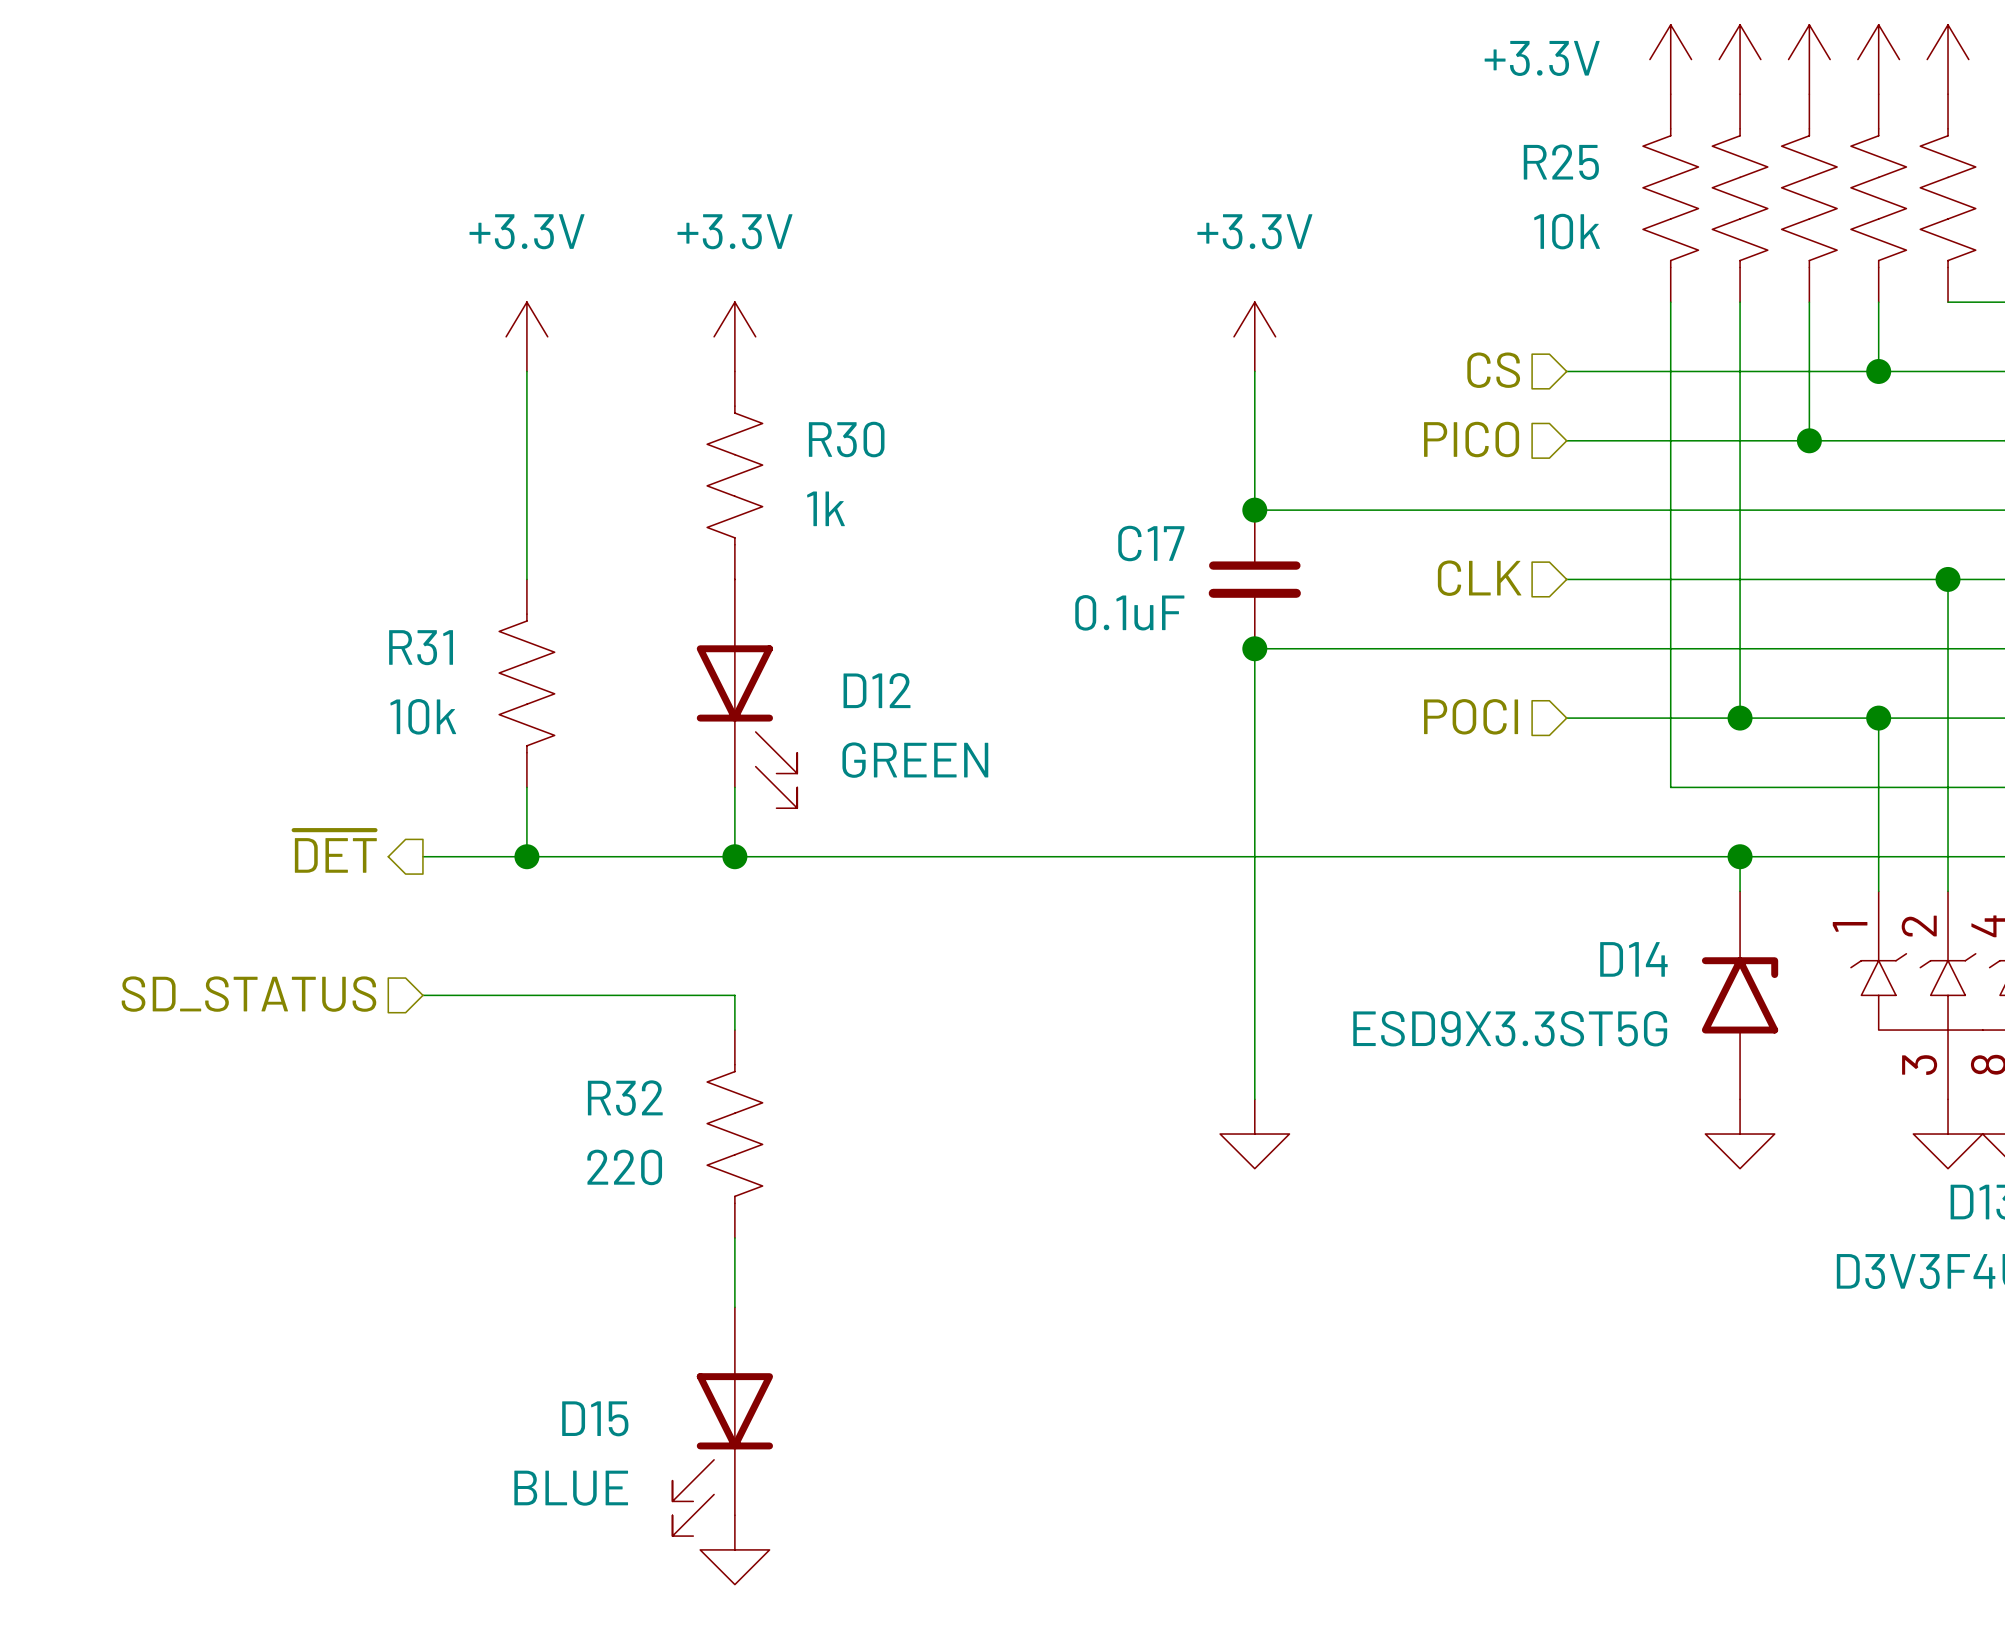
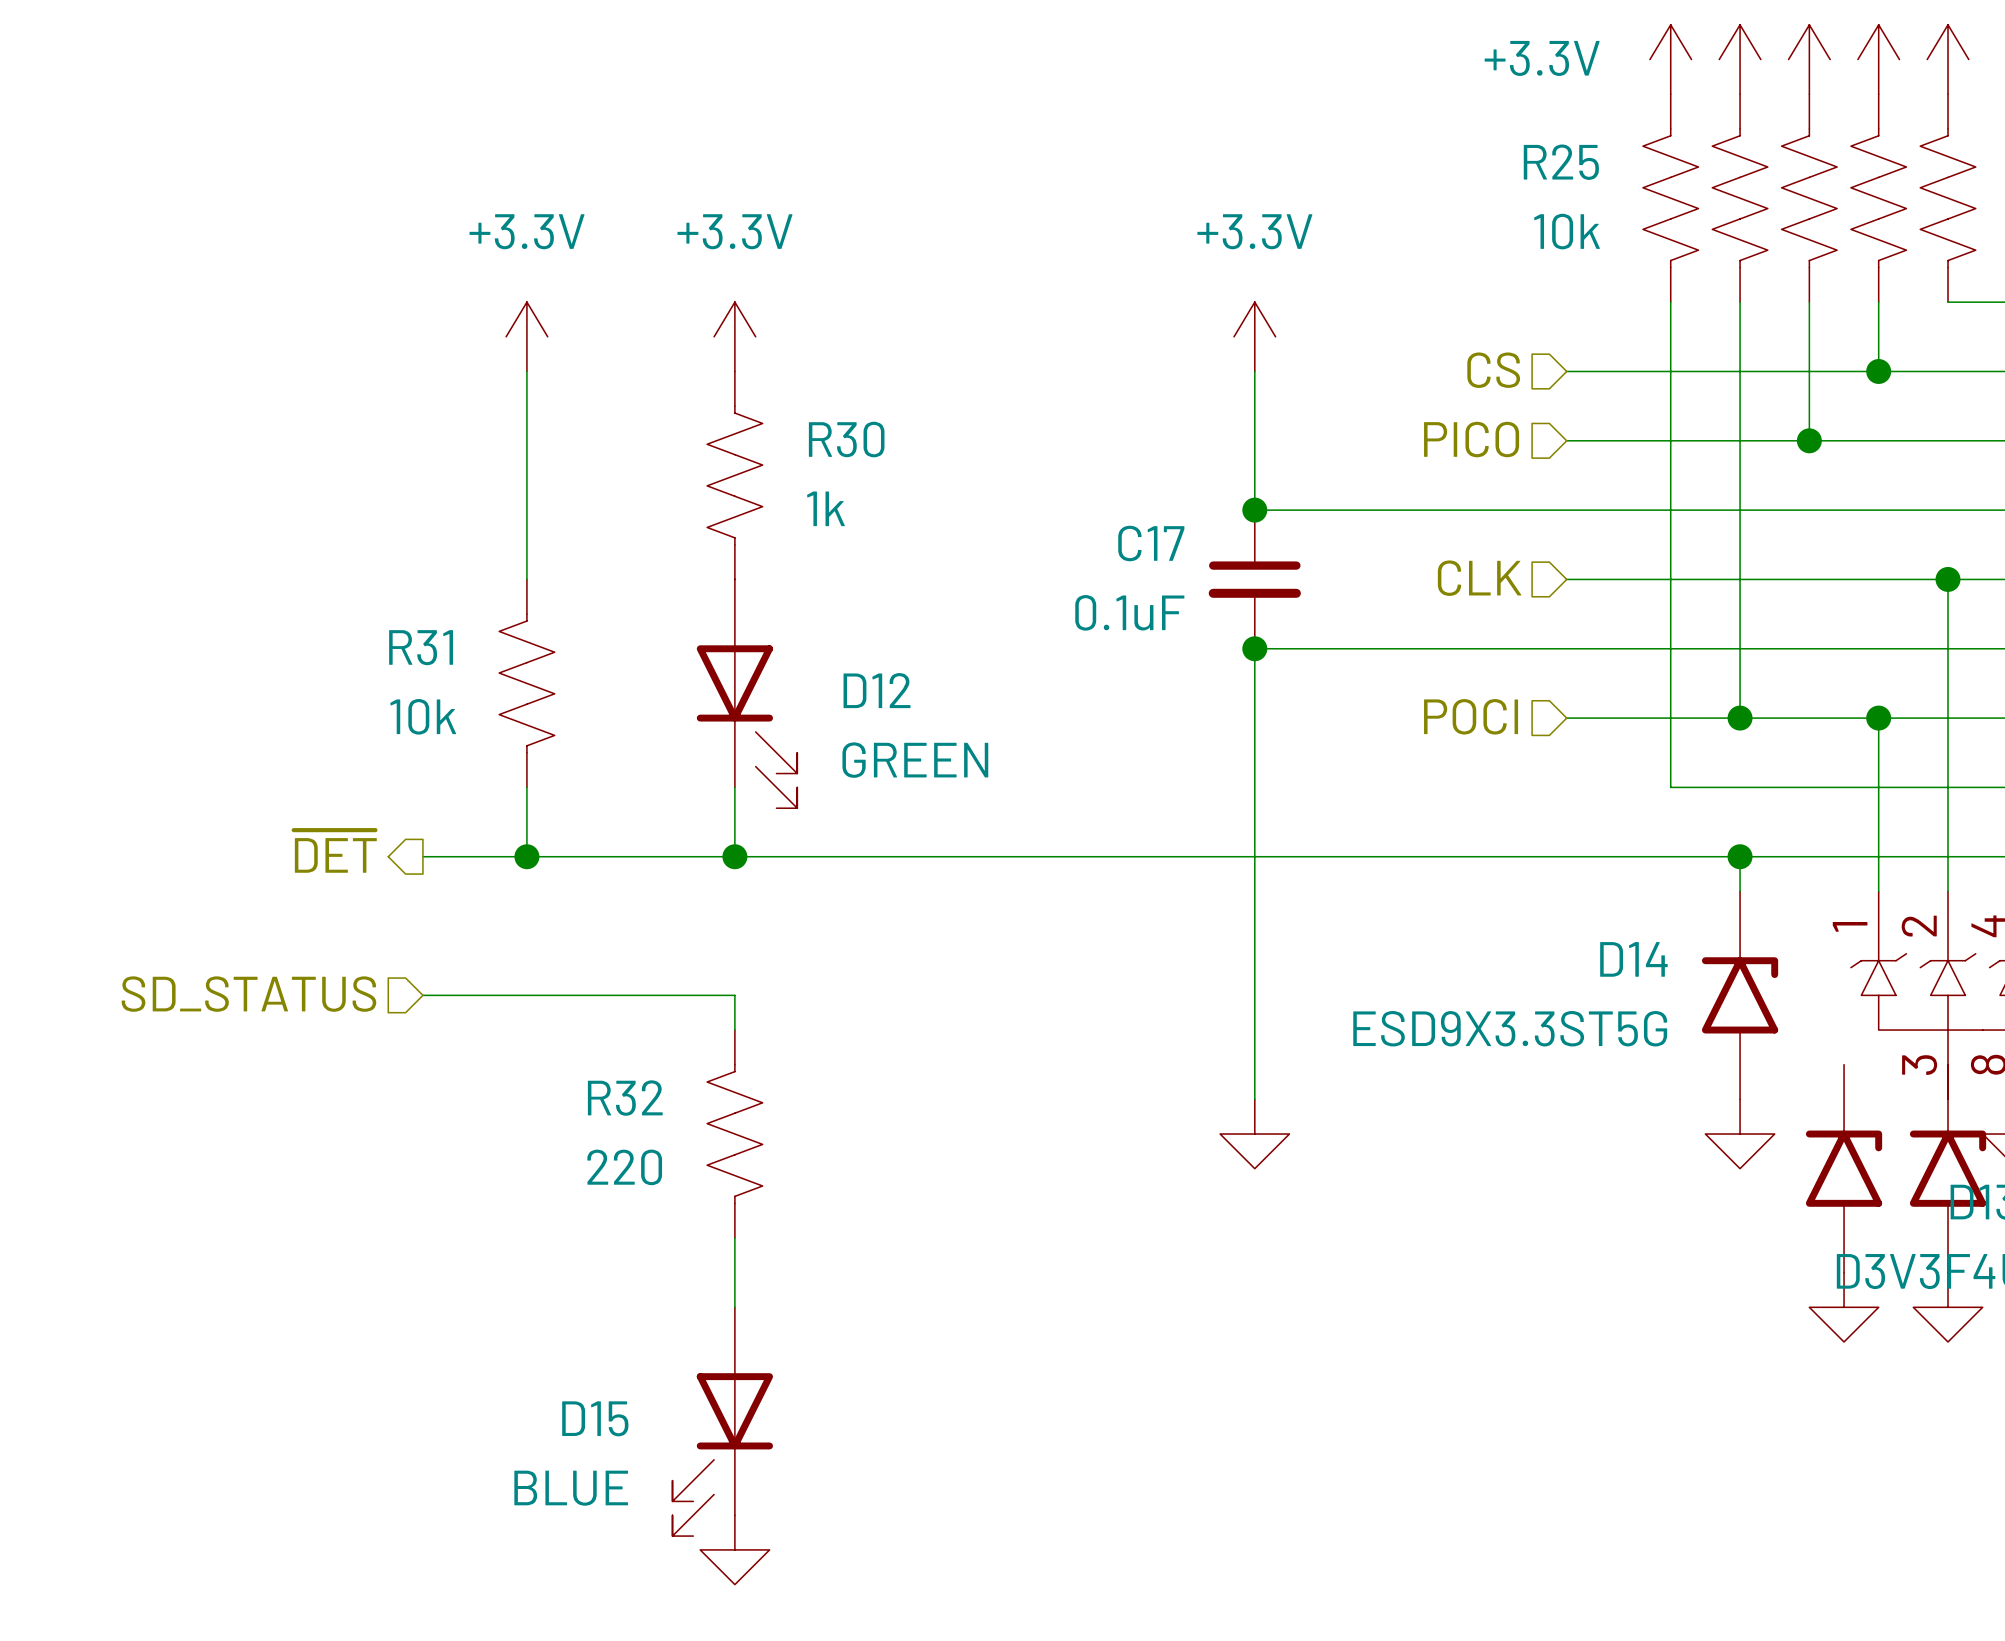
power symbol: (1948, 1134) -> none
part: none -> (1844, 1168)
part: none -> (1948, 1168)
power symbol: none -> (1844, 1307)
power symbol: none -> (1948, 1307)

